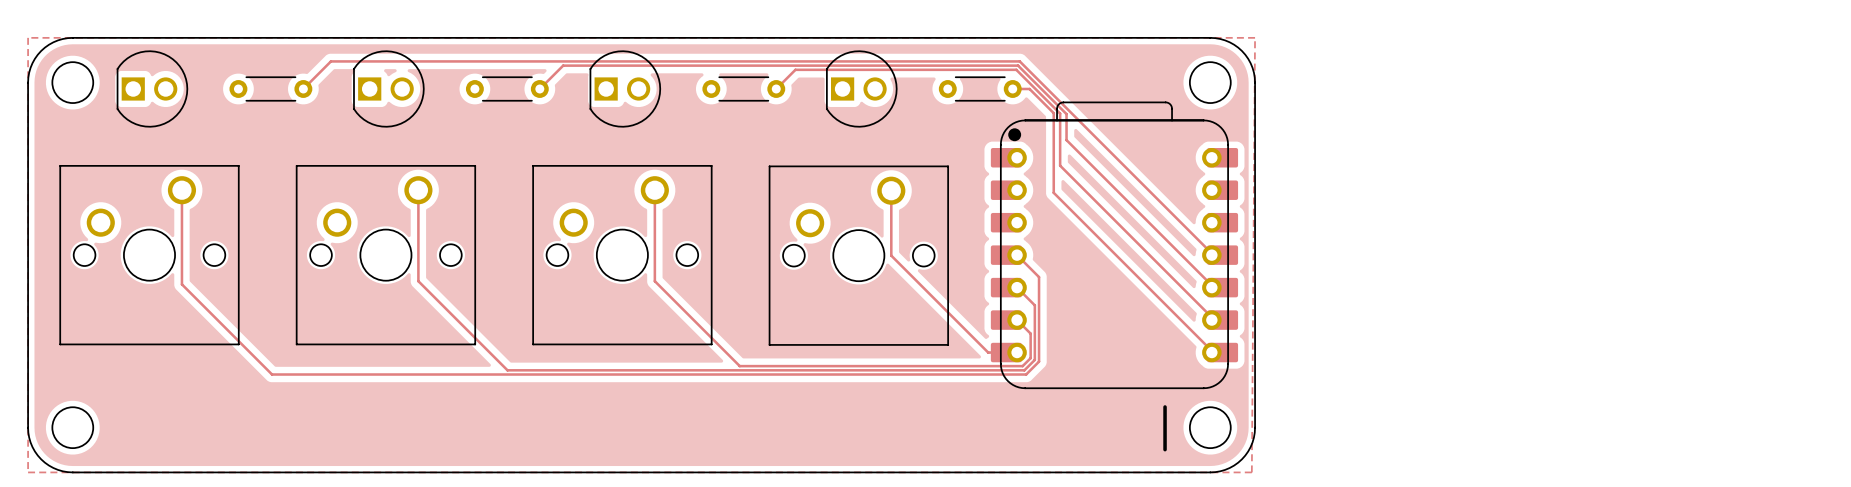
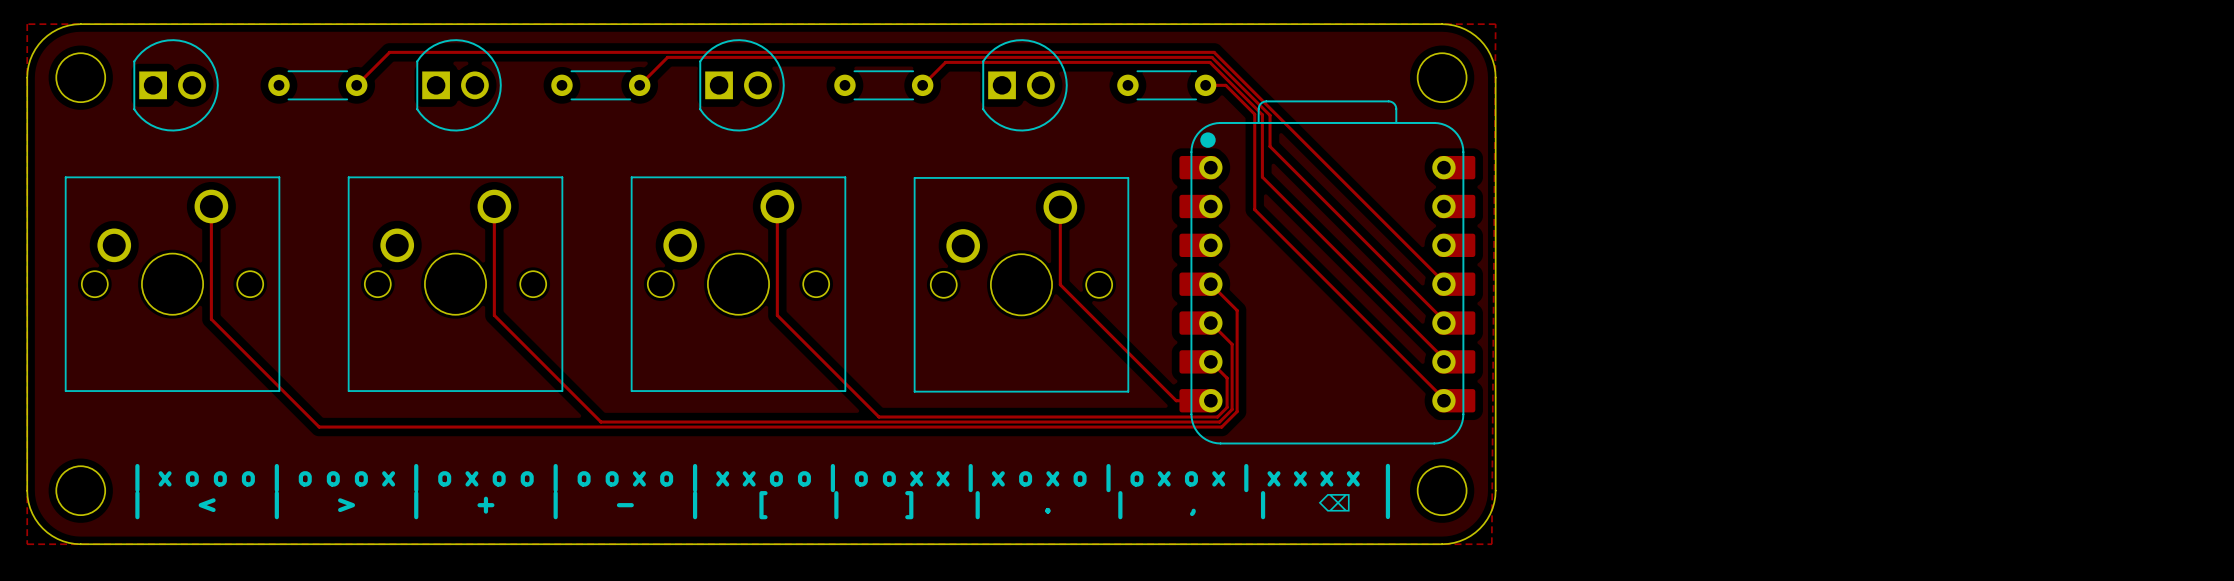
text: none -> | x o o o | o o o x | o x o o | o o x o | x x o o | o o x x | x o x o | o x o x | x x x x (747, 478)
text: none -> | < | > | + | - | [ | ] | . | , | ⌫ (743, 505)

